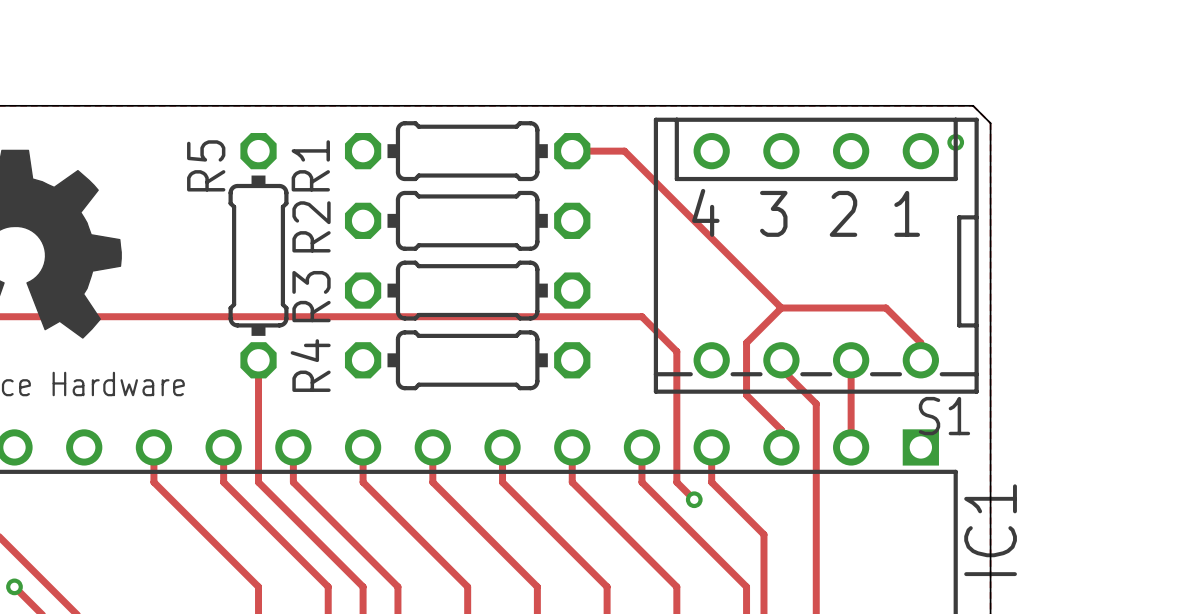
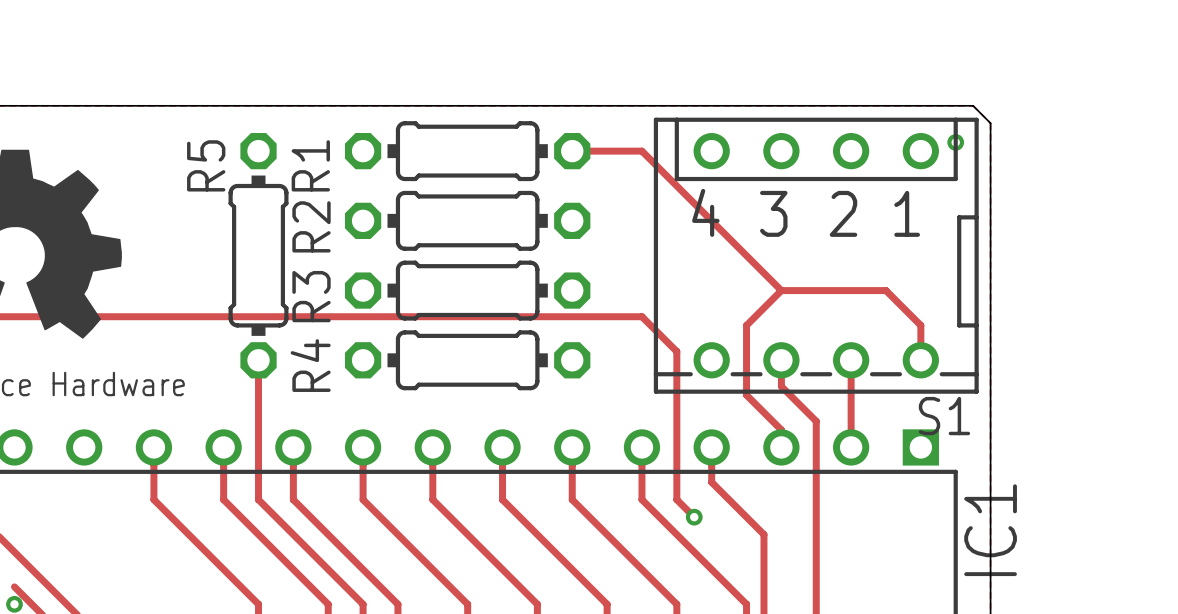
track: (624, 151) (781, 308) -> (624, 151) (641, 151) (781, 290)
track: (781, 308) (746, 342) -> (781, 290) (746, 325) (746, 342)
track: (781, 308) (885, 308) (920, 342) -> (781, 290) (885, 290) (920, 325) (920, 342)
track: (781, 369) (816, 403) (816, 421) -> (781, 369) (781, 386) (816, 421)
track: (153, 482) (258, 586) (258, 604) -> (153, 482) (153, 499) (258, 604)
track: (223, 482) (328, 586) (328, 604) -> (223, 482) (223, 499) (328, 604)
track: (258, 482) (363, 586) (363, 604) -> (258, 482) (258, 499) (363, 604)
track: (293, 482) (397, 586) (397, 604) -> (293, 482) (293, 499) (397, 604)
track: (363, 482) (467, 586) (467, 604) -> (363, 482) (363, 499) (467, 604)
track: (432, 482) (537, 586) (537, 604) -> (432, 482) (432, 499) (537, 604)
track: (502, 482) (607, 586) (607, 604) -> (502, 482) (502, 499) (607, 604)
track: (572, 482) (676, 586) (676, 604) -> (572, 482) (572, 499) (676, 604)
track: (641, 482) (746, 586) (746, 604) -> (641, 482) (641, 499) (746, 604)
track: (676, 482) (694, 499) -> (676, 482) (676, 499) (694, 517)
via position: (694, 499) -> (694, 517)
via position: (14, 586) -> (14, 604)

